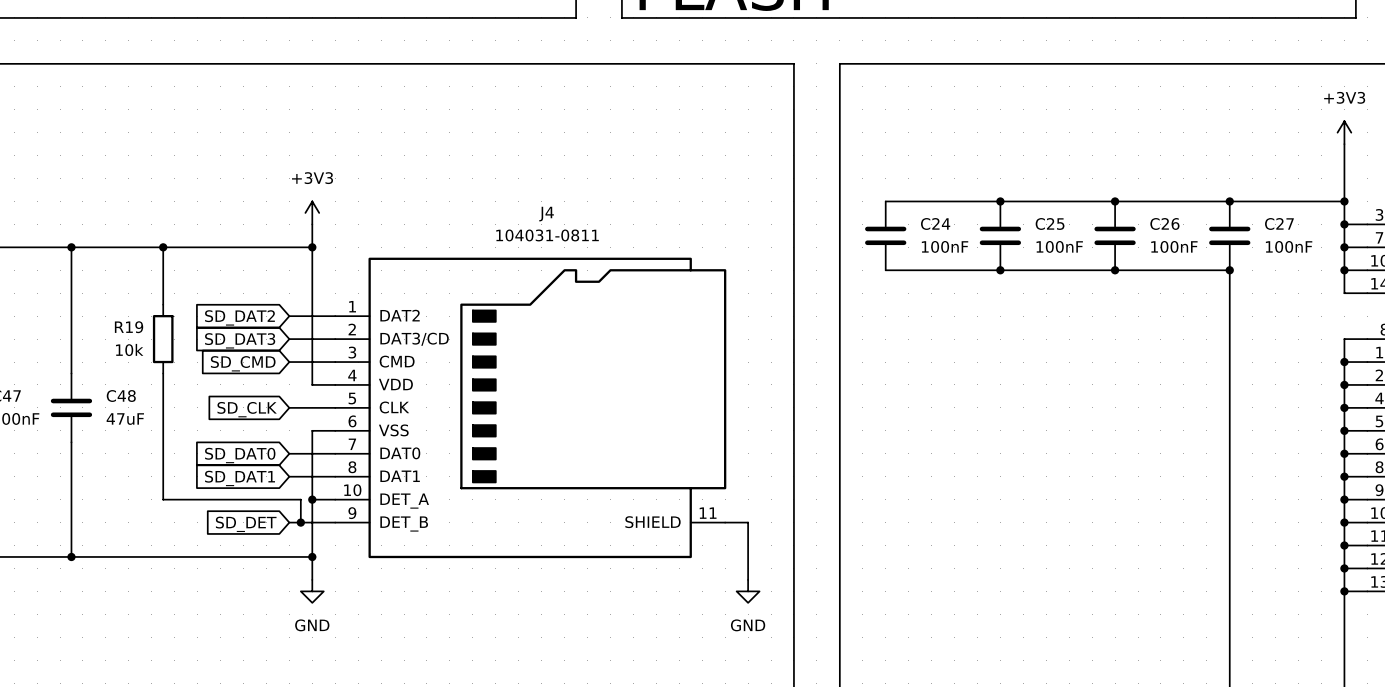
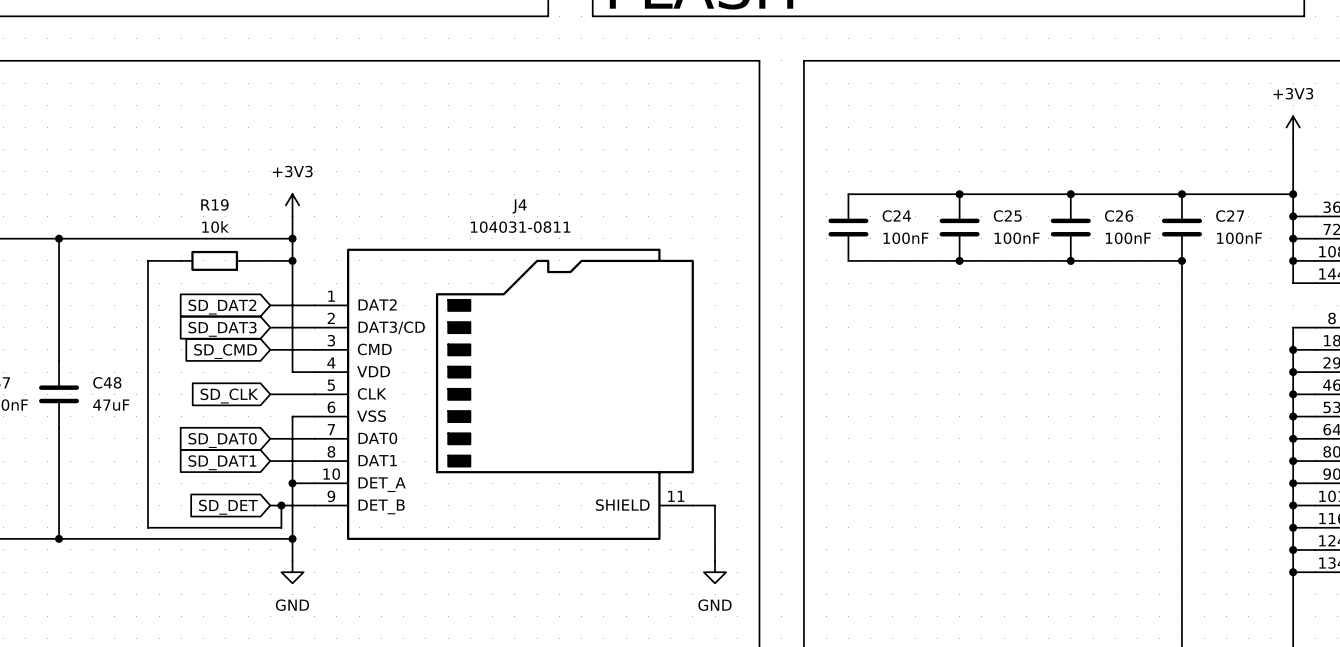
wire: (163, 247) (163, 270) -> (181, 260) (147, 260)
junction: (163, 247) -> none
wire: none -> (248, 260) (292, 260)
junction: none -> (292, 260)
wire: none -> (147, 294) (147, 360)
R19 name position: R19 (129, 327) -> R19 (214, 204)
R19 rotation: 0° (163, 339) -> 90° clockwise (214, 260)
R19 position: (163, 339) -> (214, 260)
wire: (163, 499) (300, 499) (300, 522) -> (147, 483) (147, 527) (281, 527) (281, 505)

